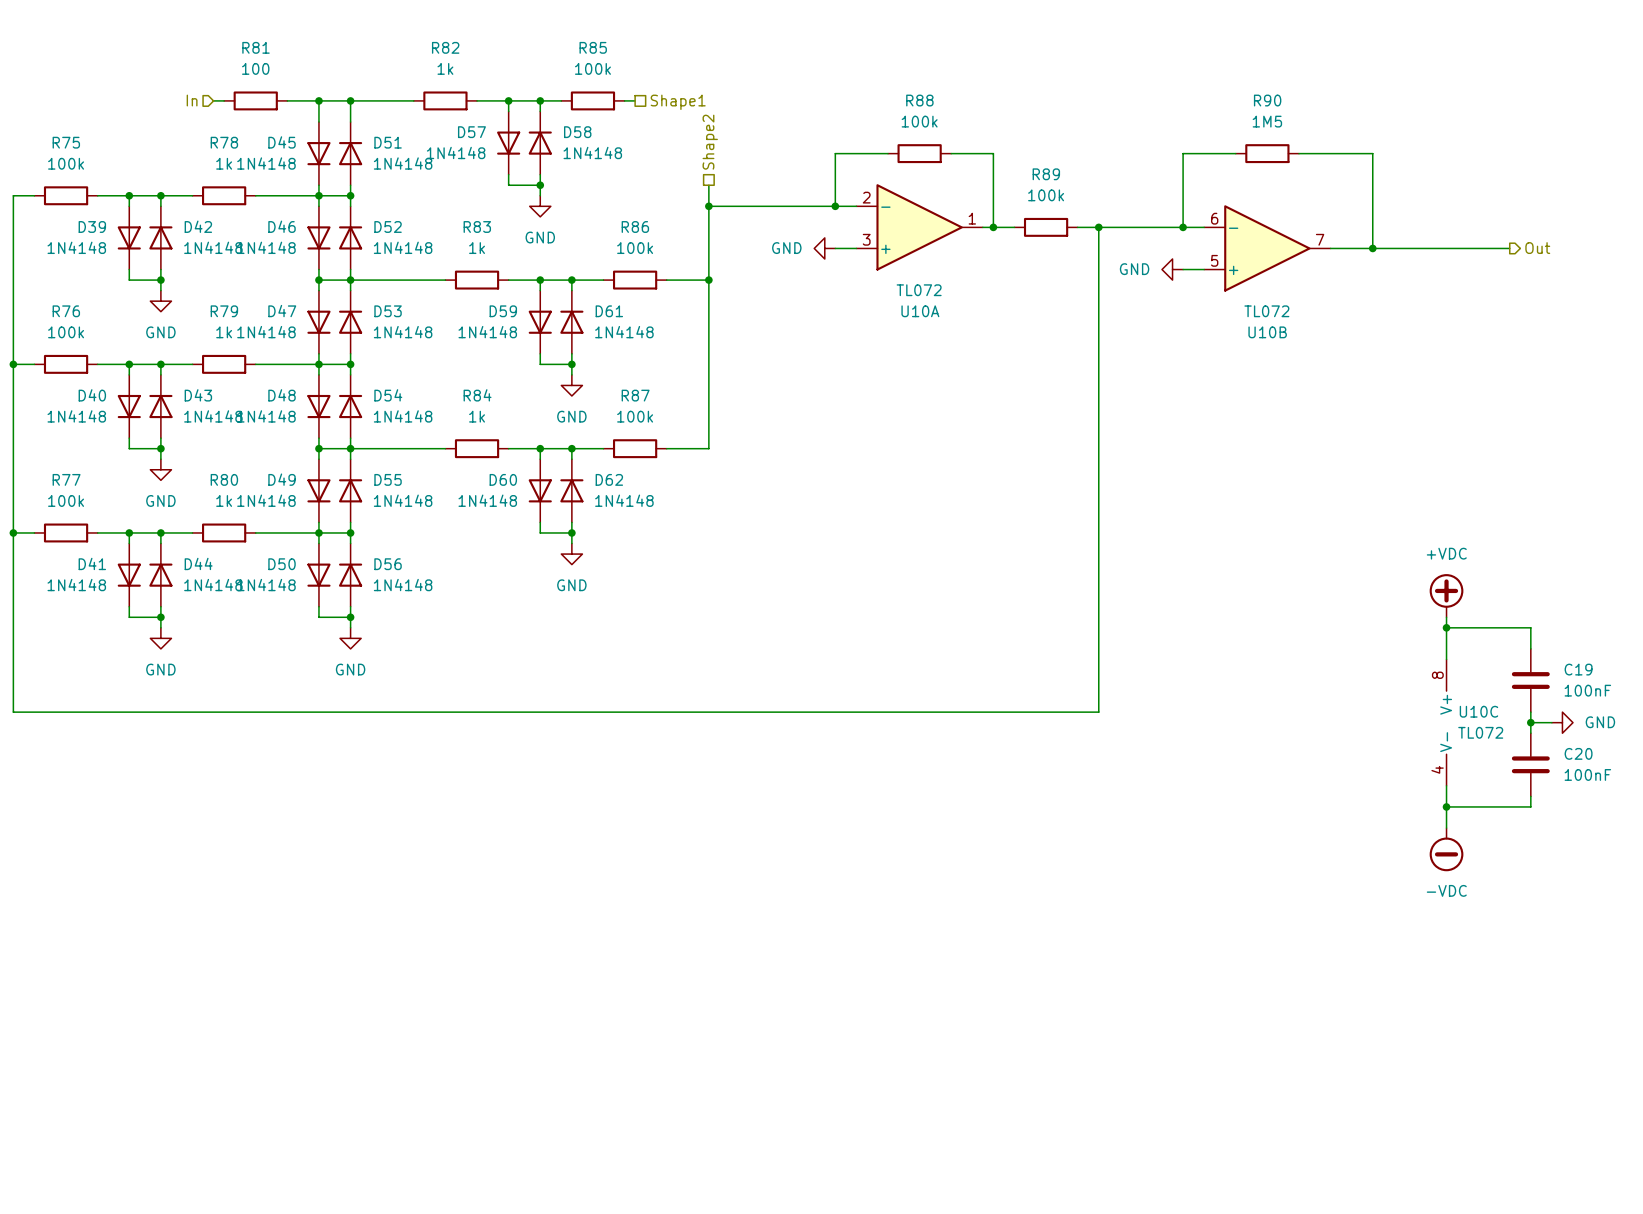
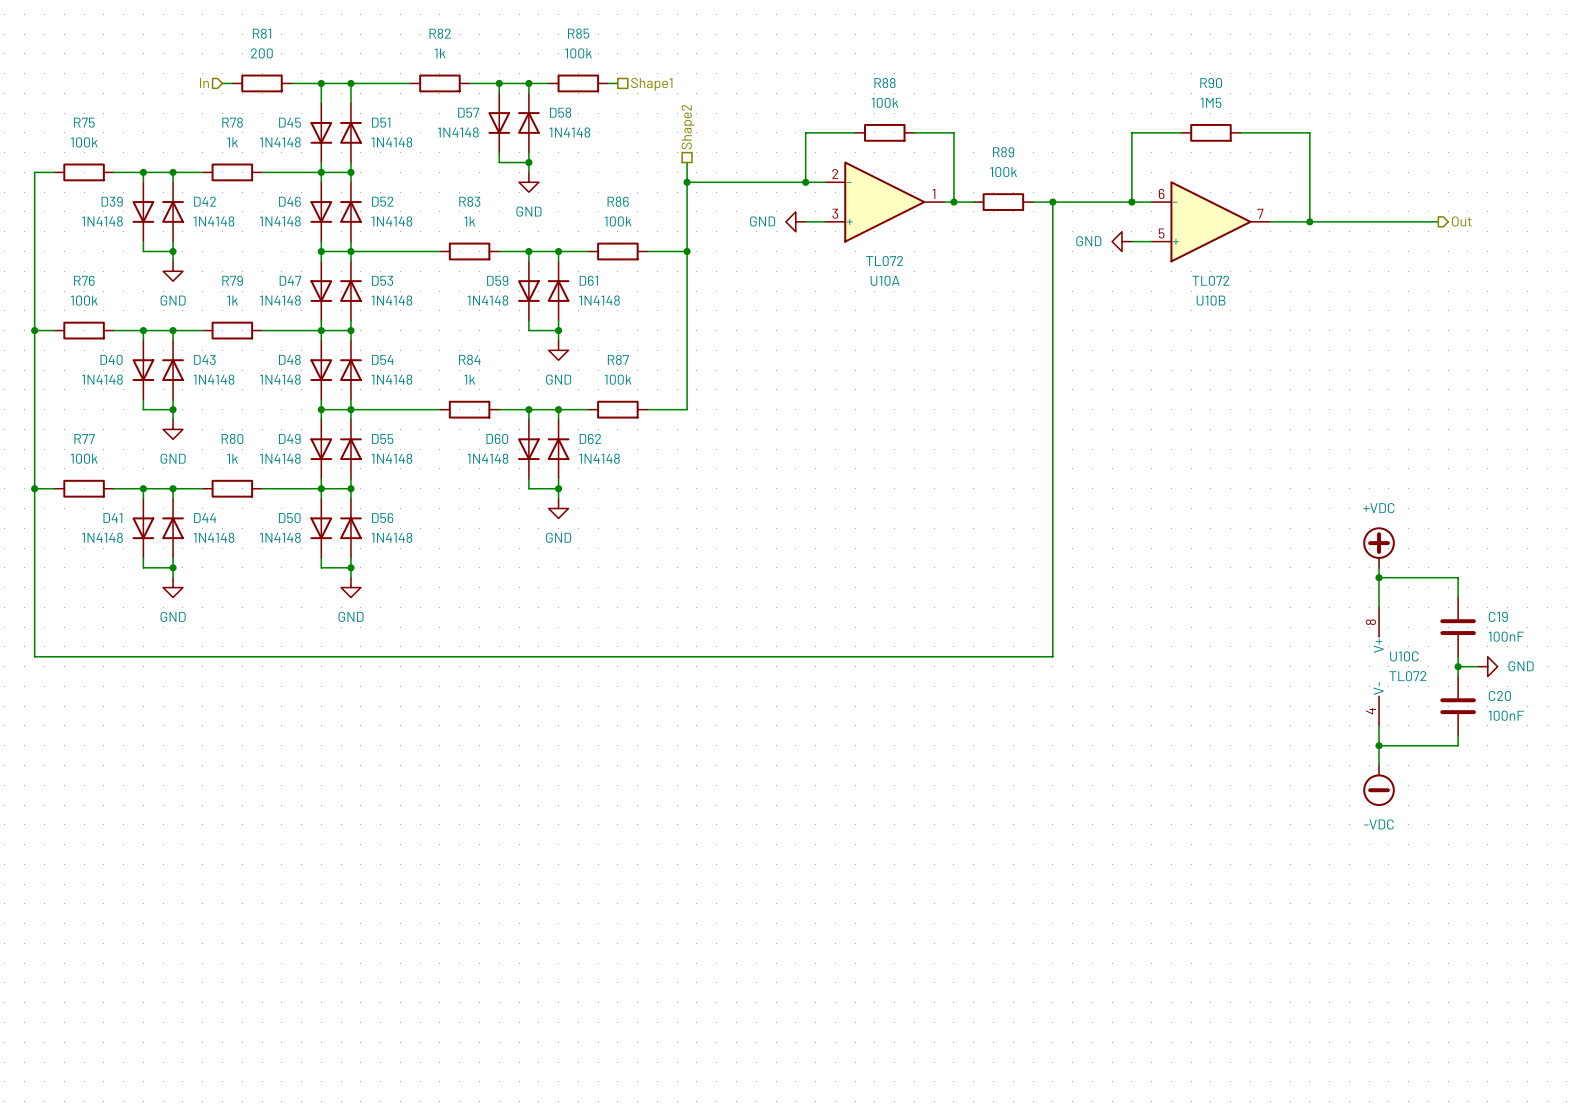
R81 value: 100 (255, 68) -> 200 (261, 53)

